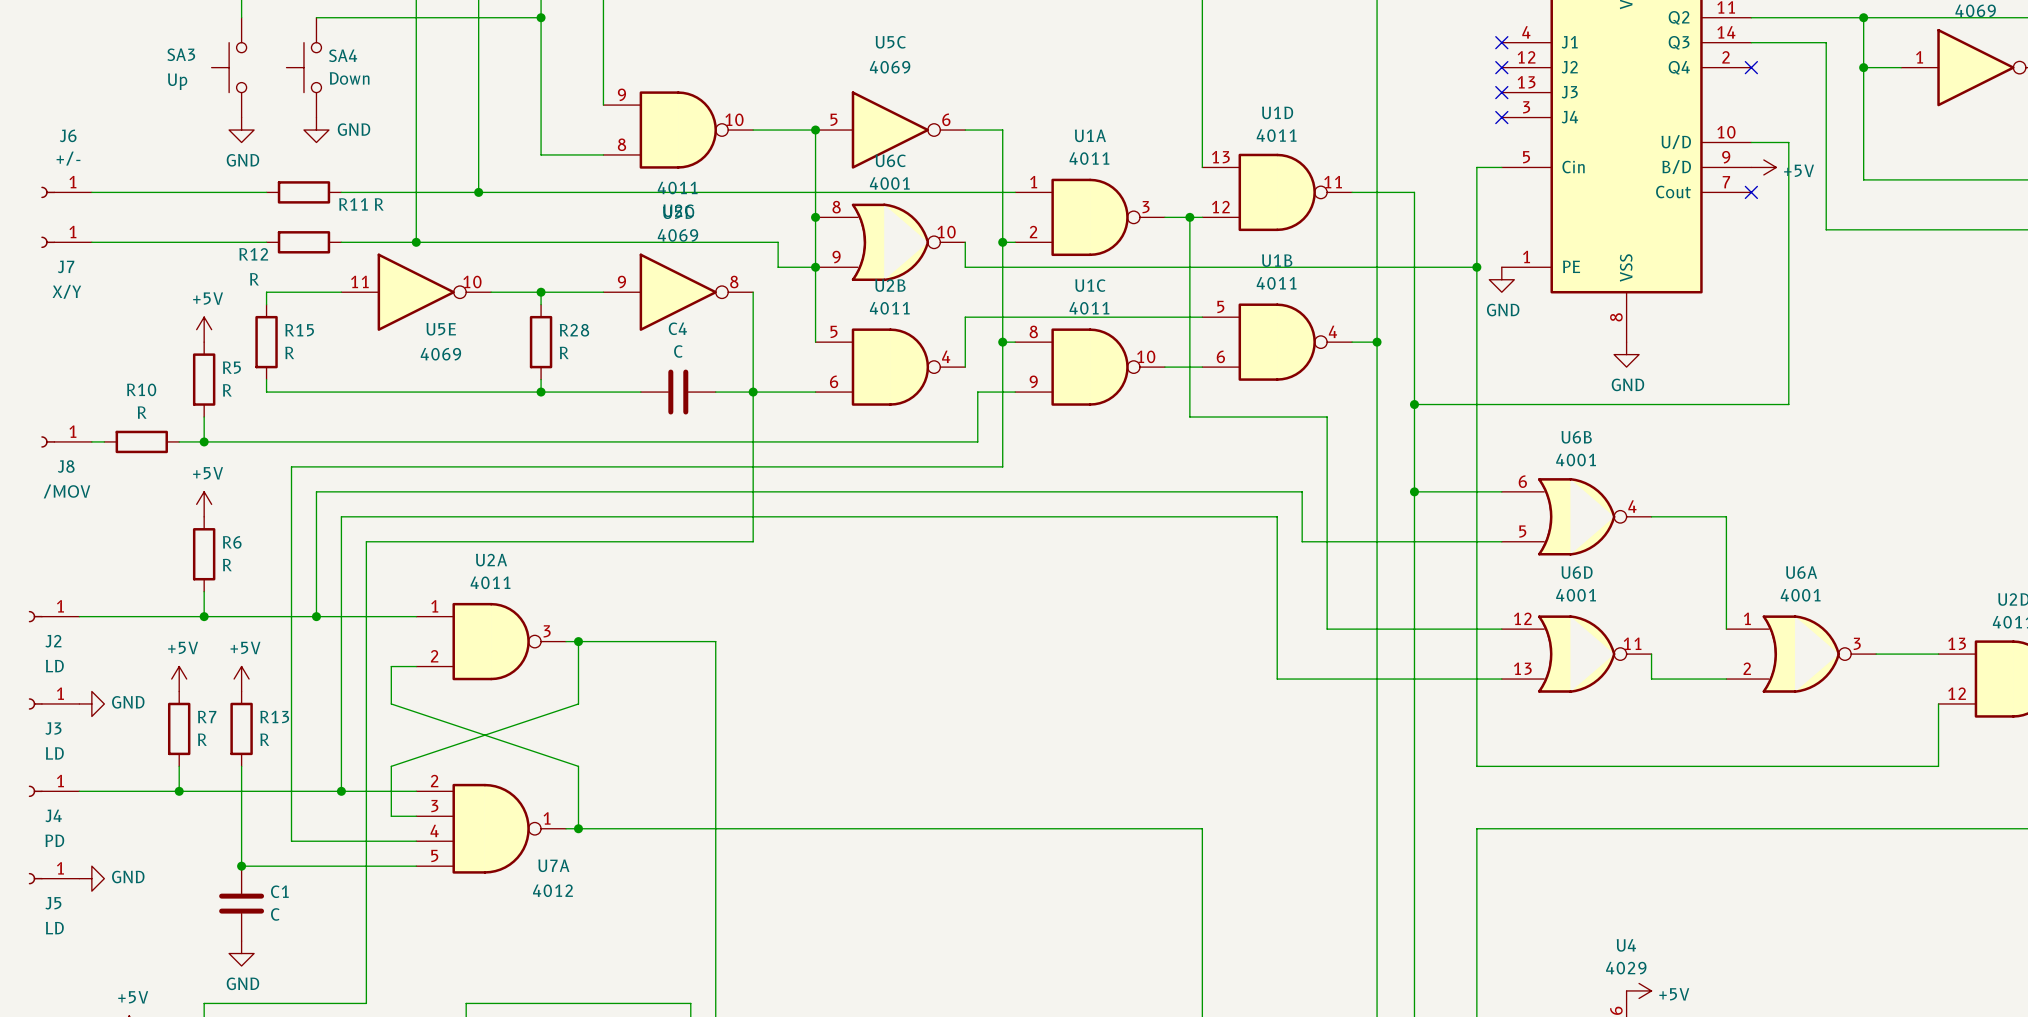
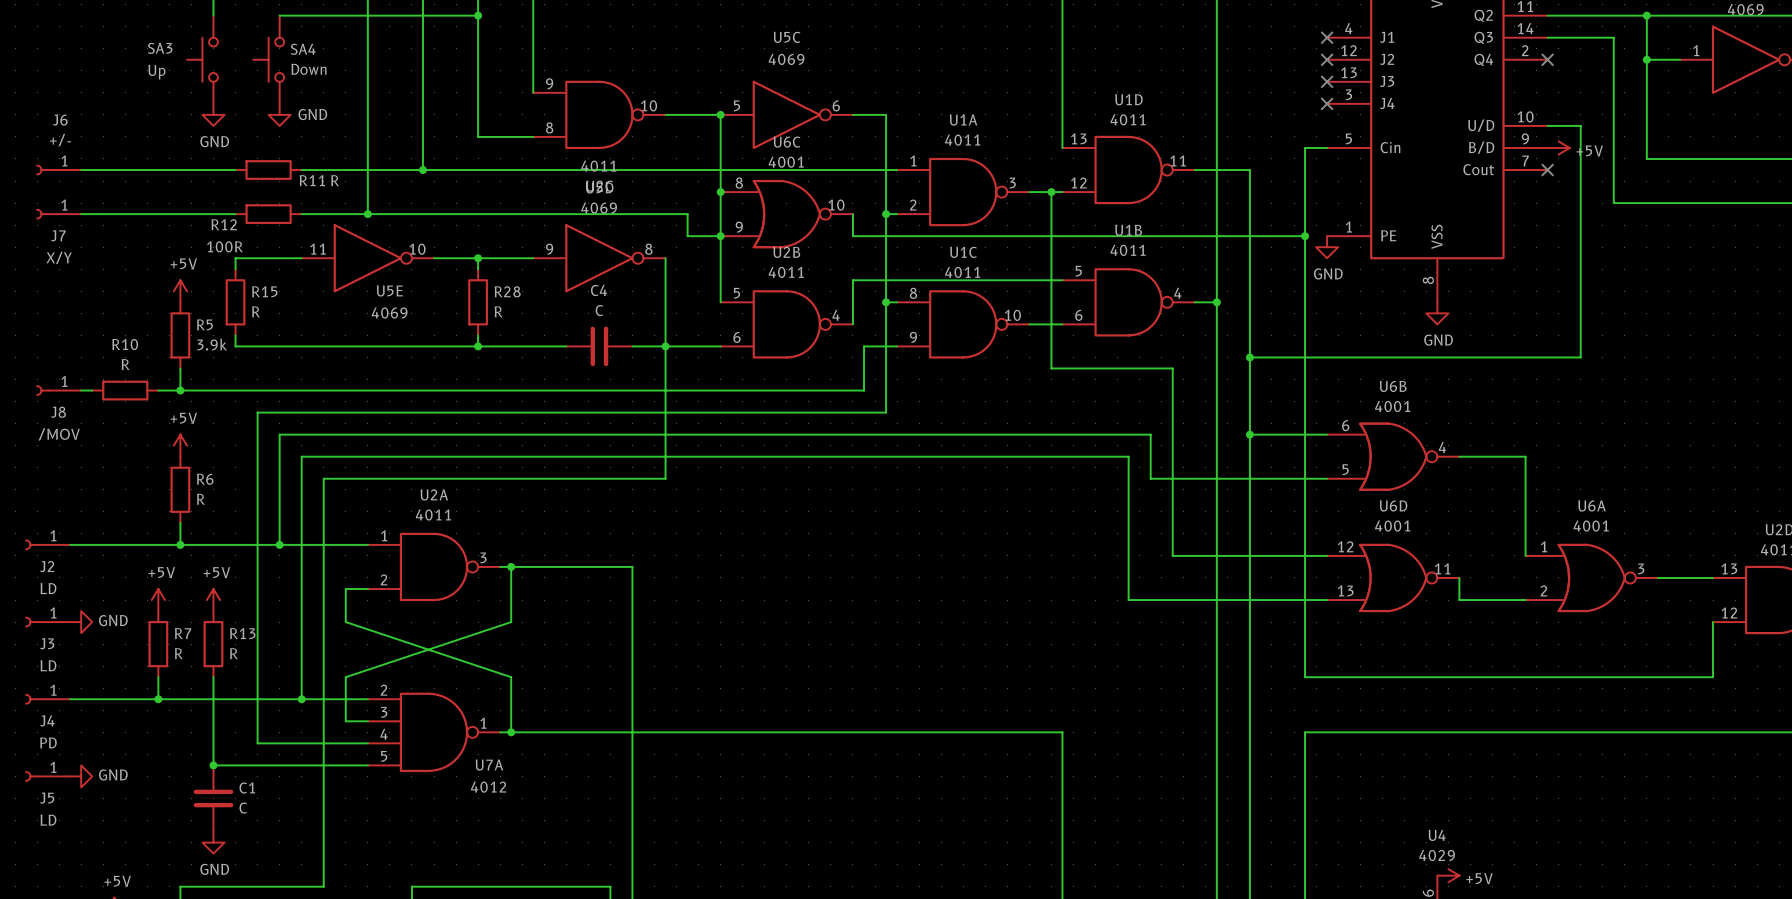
R12 value: R (254, 279) -> 100R (224, 246)
R5 value: R (227, 390) -> 3.9k (212, 344)

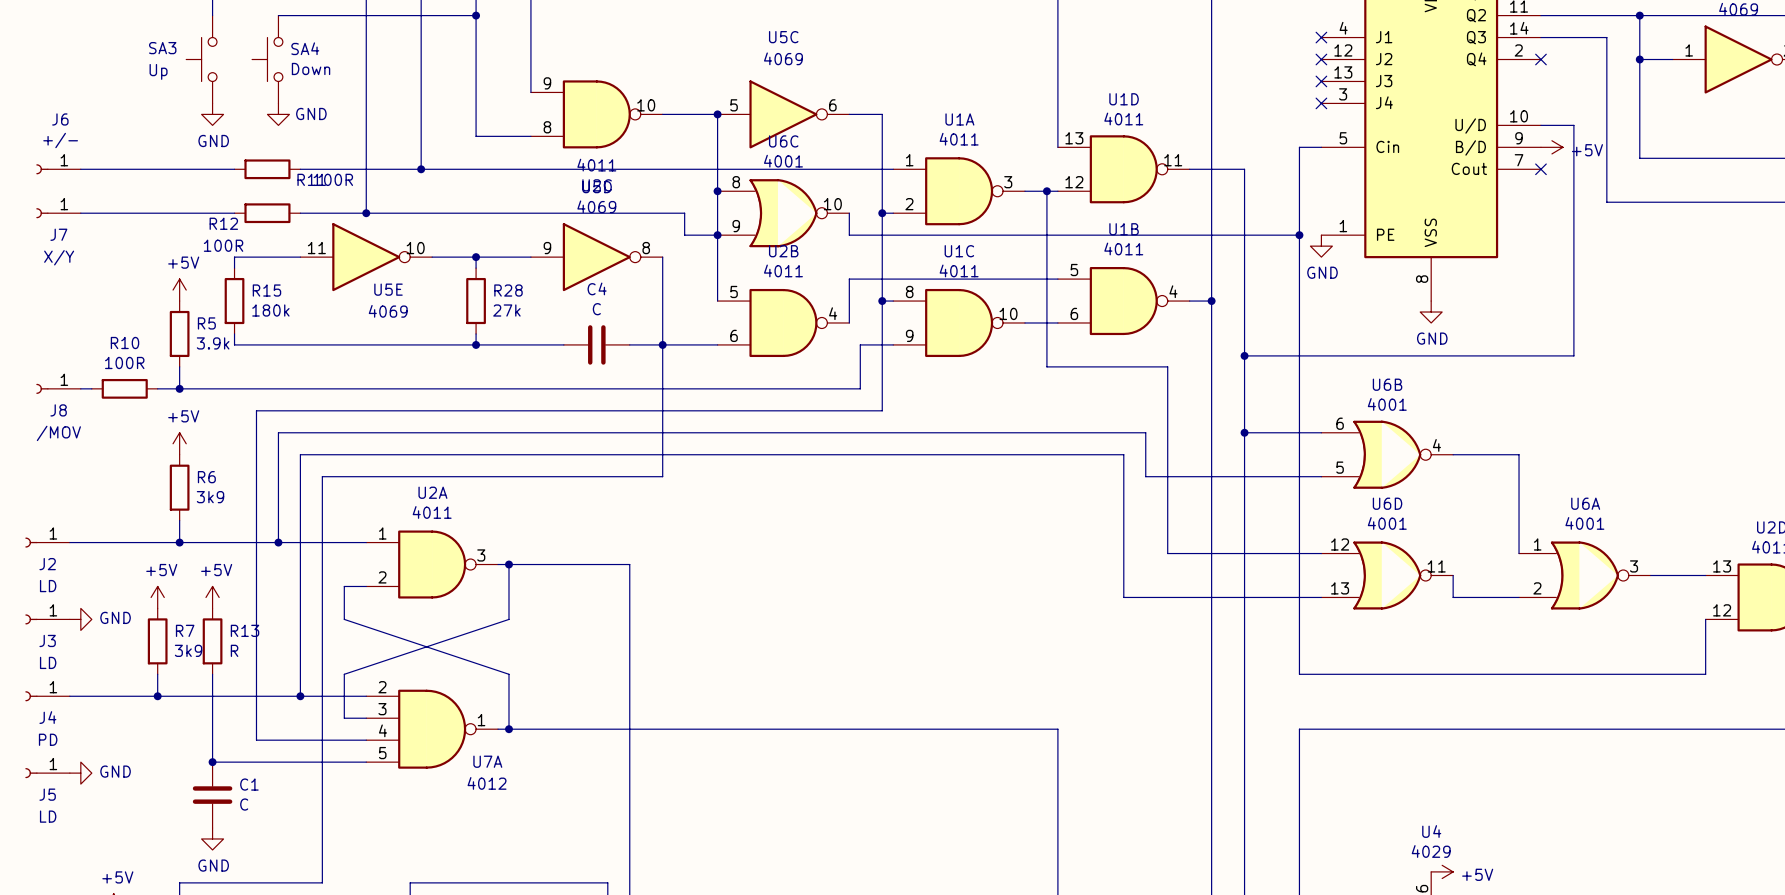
R11 value: R (335, 180) -> 100R (333, 179)
R15 value: R (256, 311) -> 180k (270, 310)
R28 value: R (498, 311) -> 27k (506, 310)
R10 value: R (125, 364) -> 100R (124, 362)
R6 value: R (200, 499) -> 3k9 (210, 497)
R7 value: R (178, 653) -> 3k9 (188, 650)

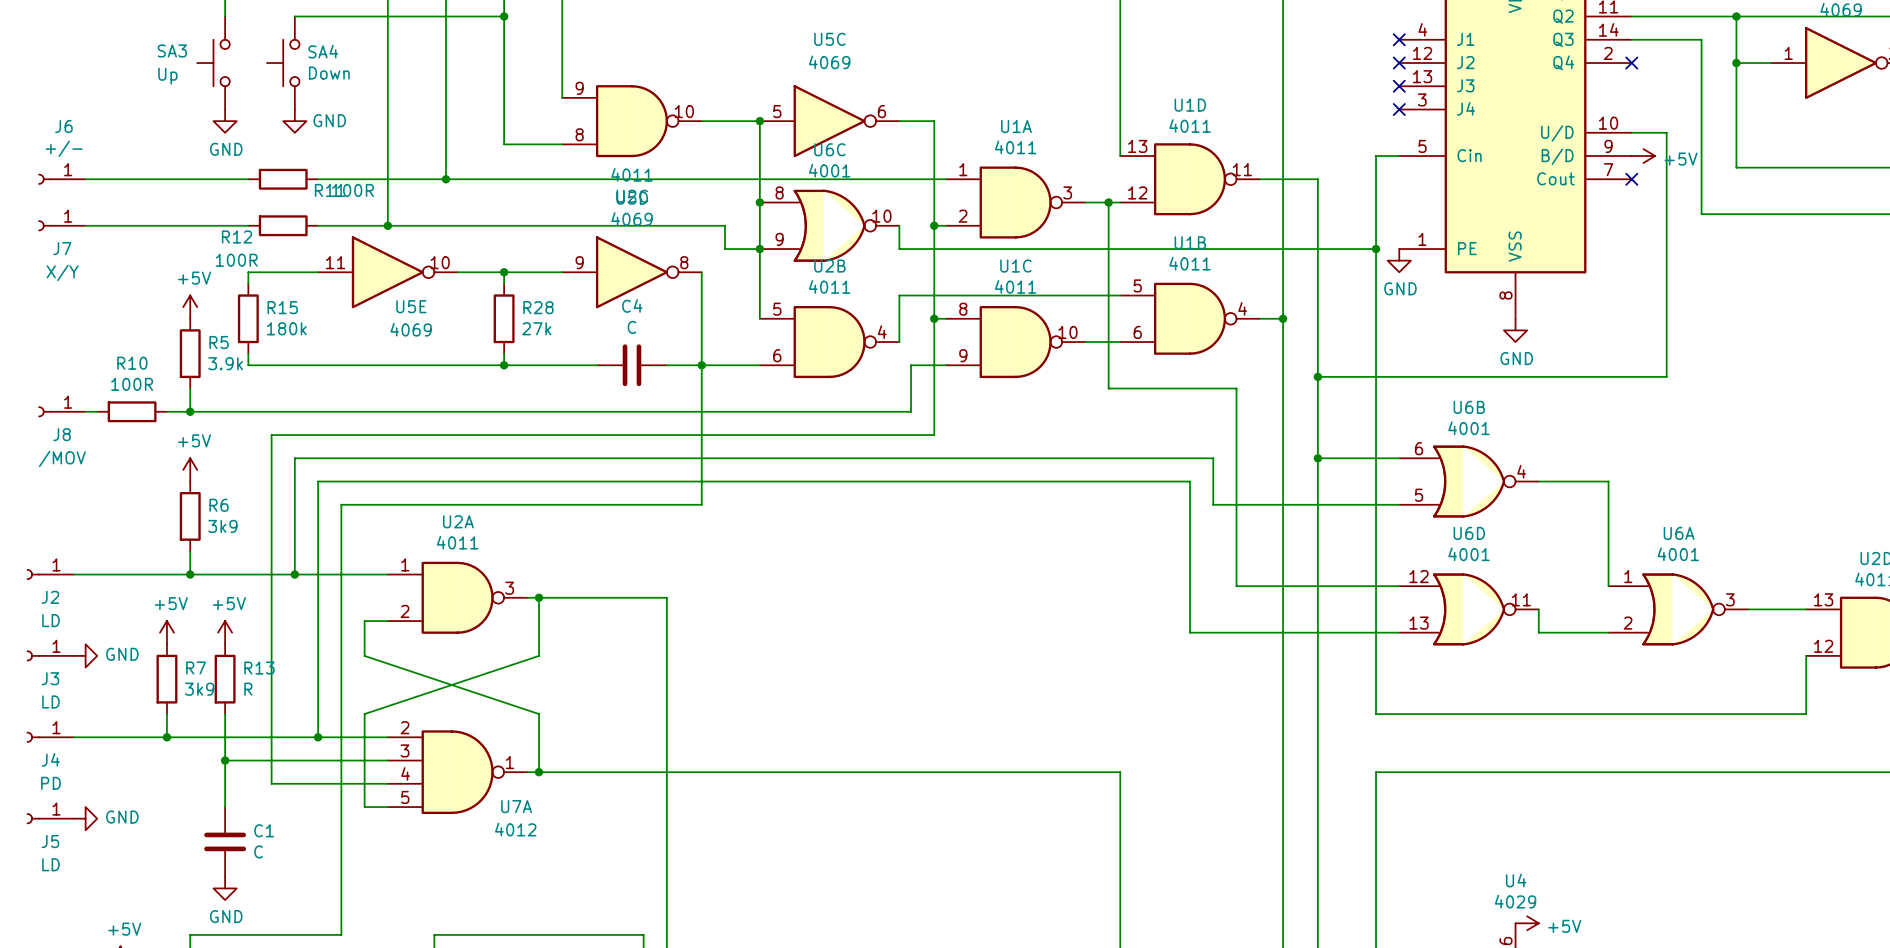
wire: (212, 762) (344, 762) -> (225, 760) (364, 760) (364, 807)
junction position: (212, 762) -> (225, 760)

